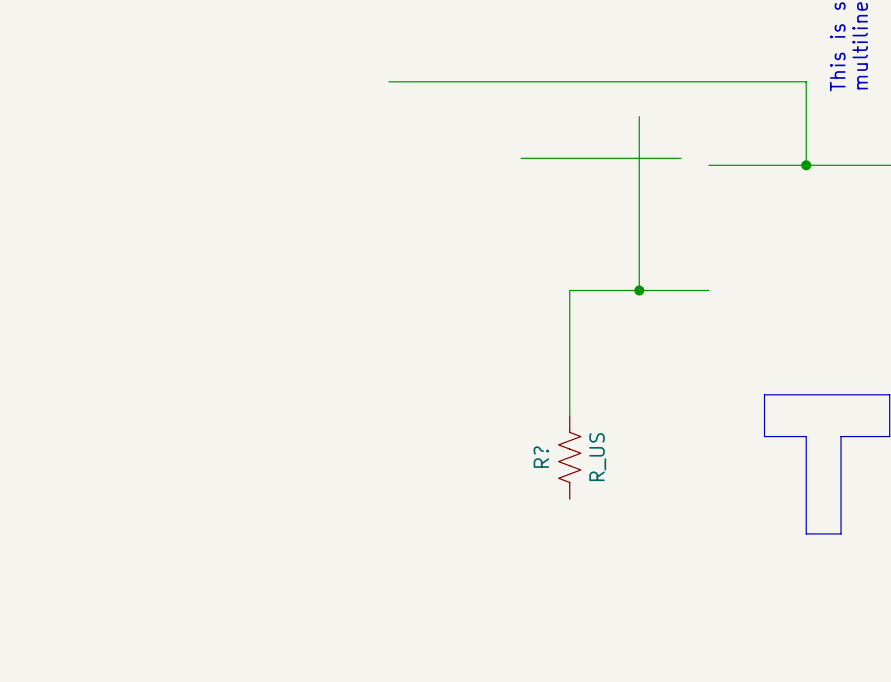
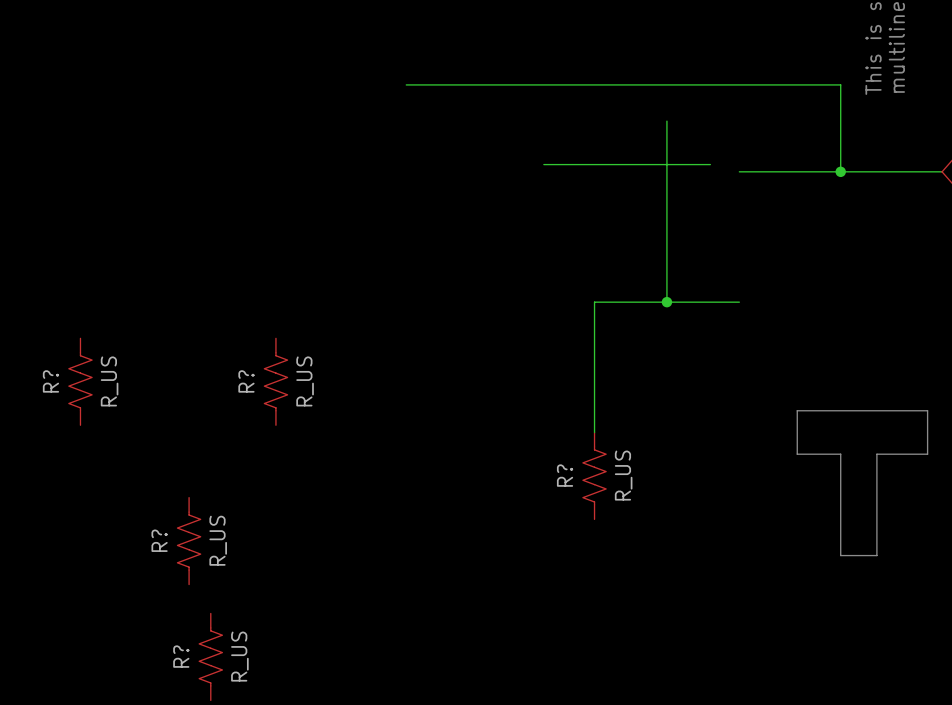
R?: none -> R_US (80, 381)
R?: none -> R_US (275, 381)
R?: none -> R_US (189, 541)
R?: none -> R_US (210, 656)

